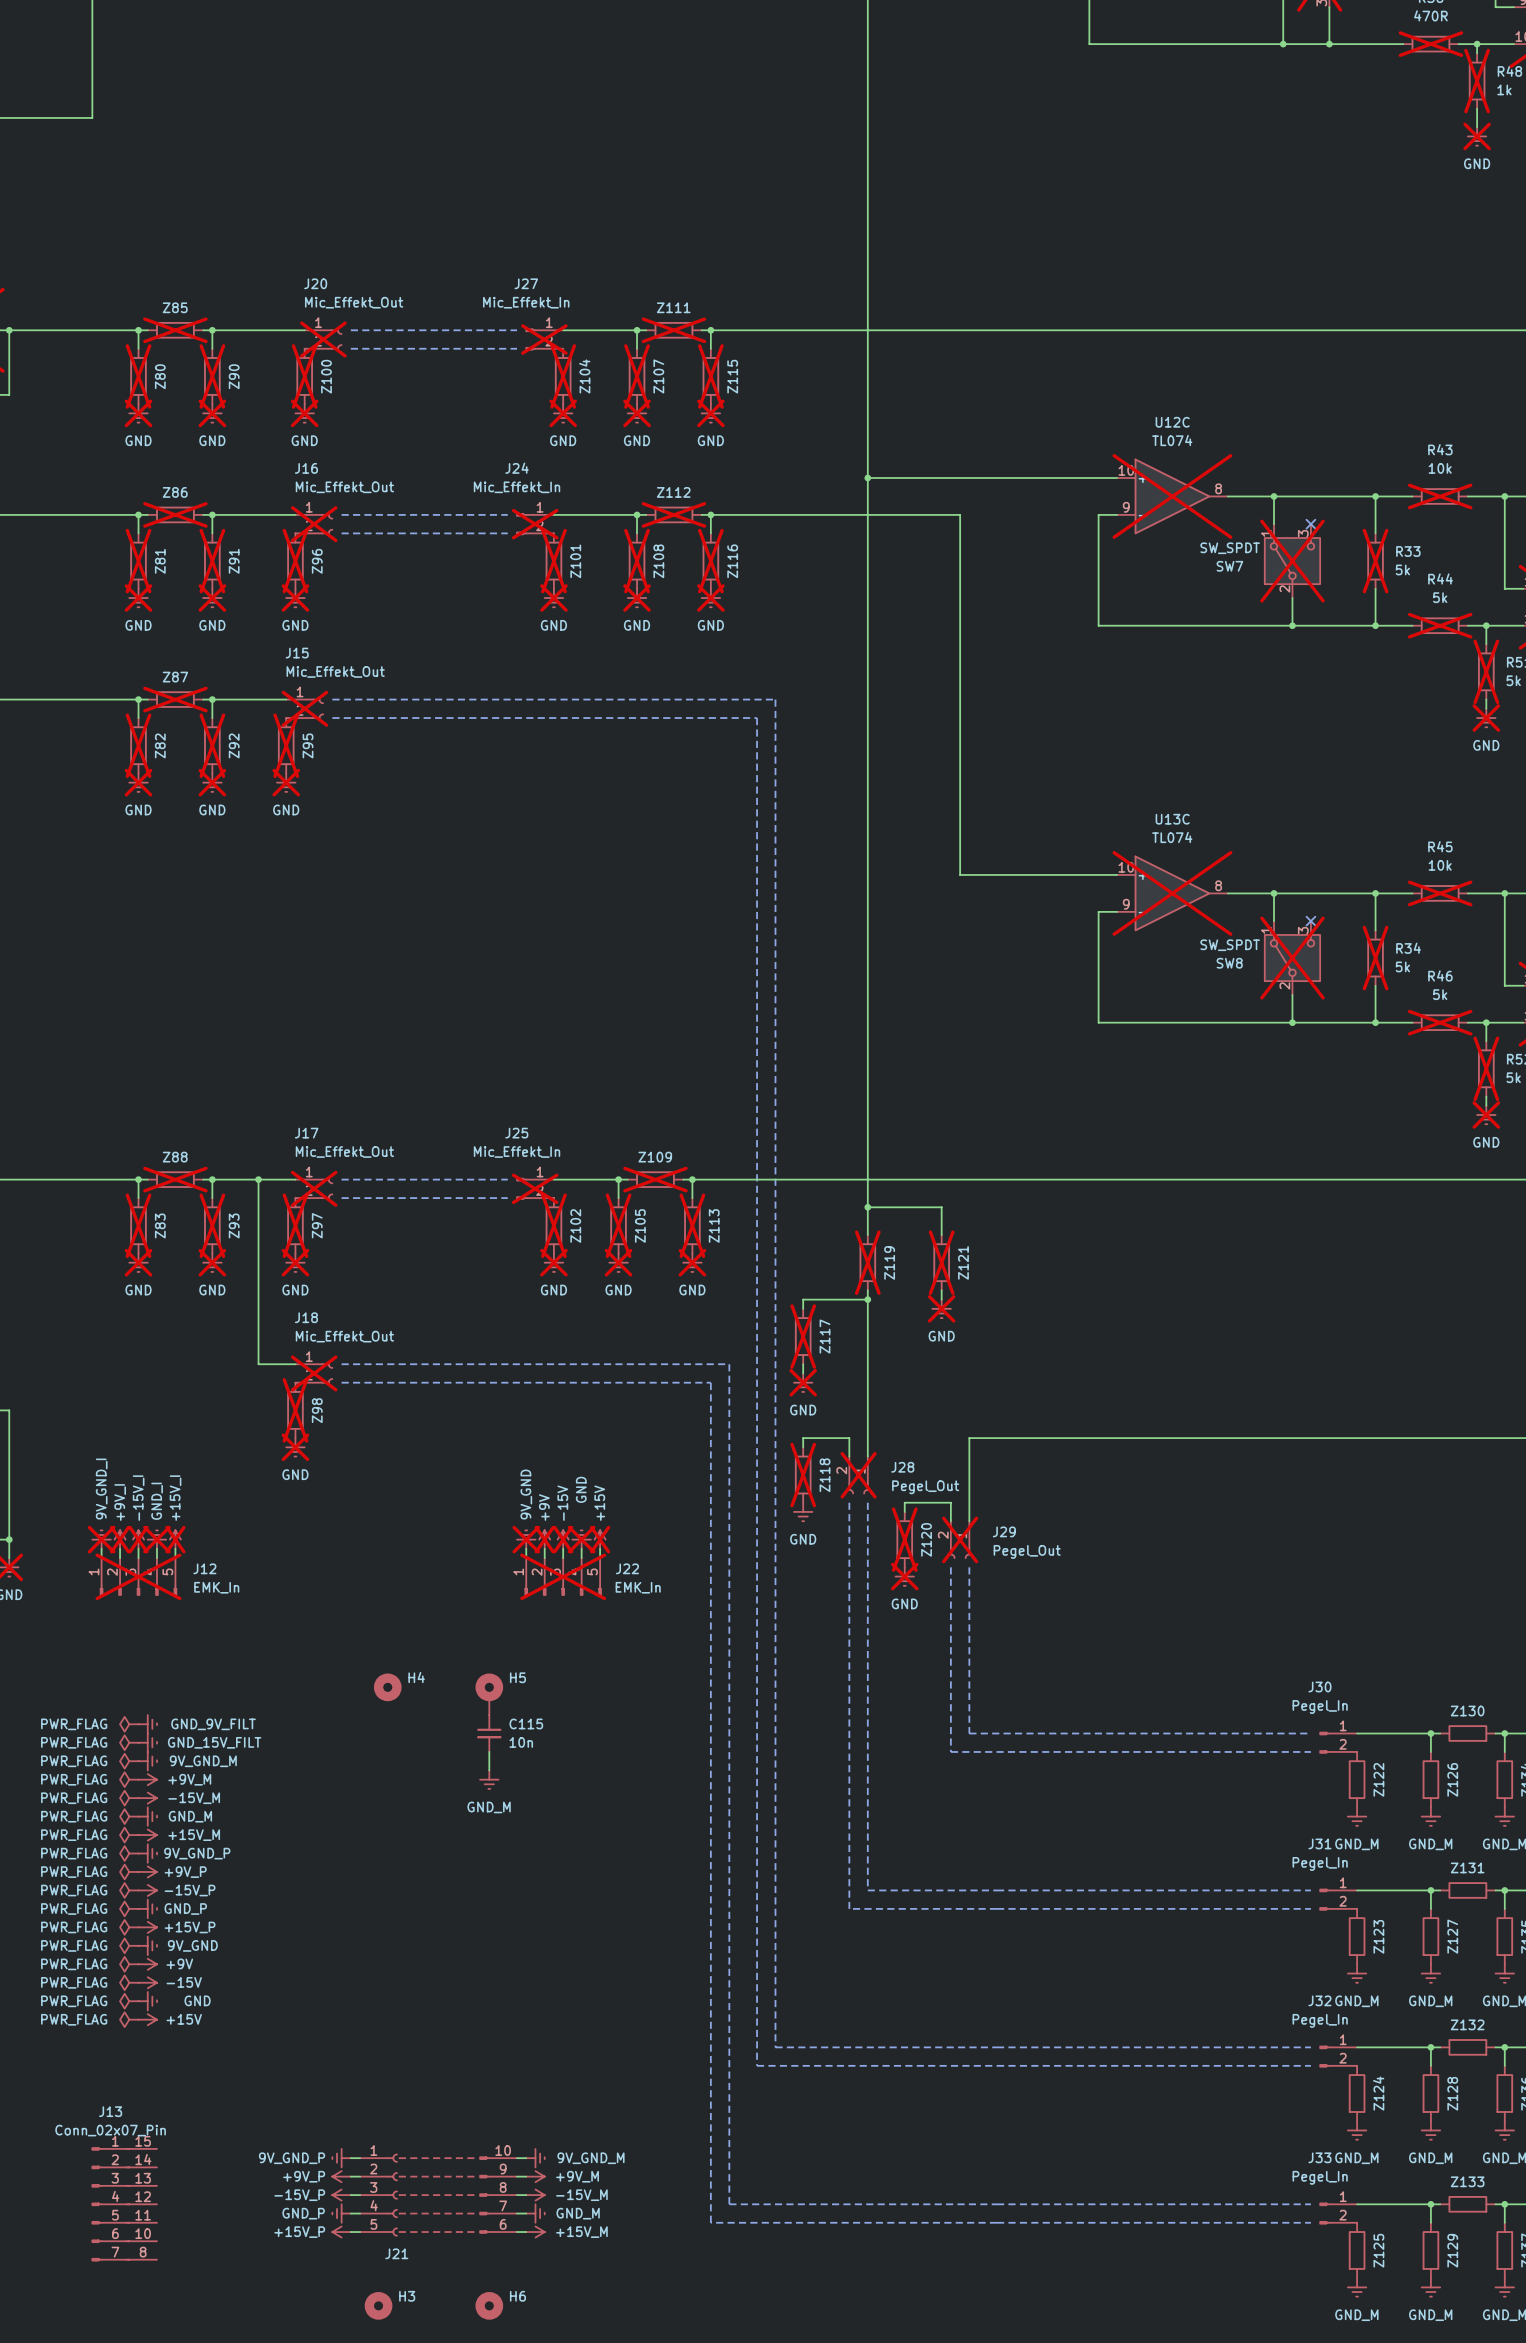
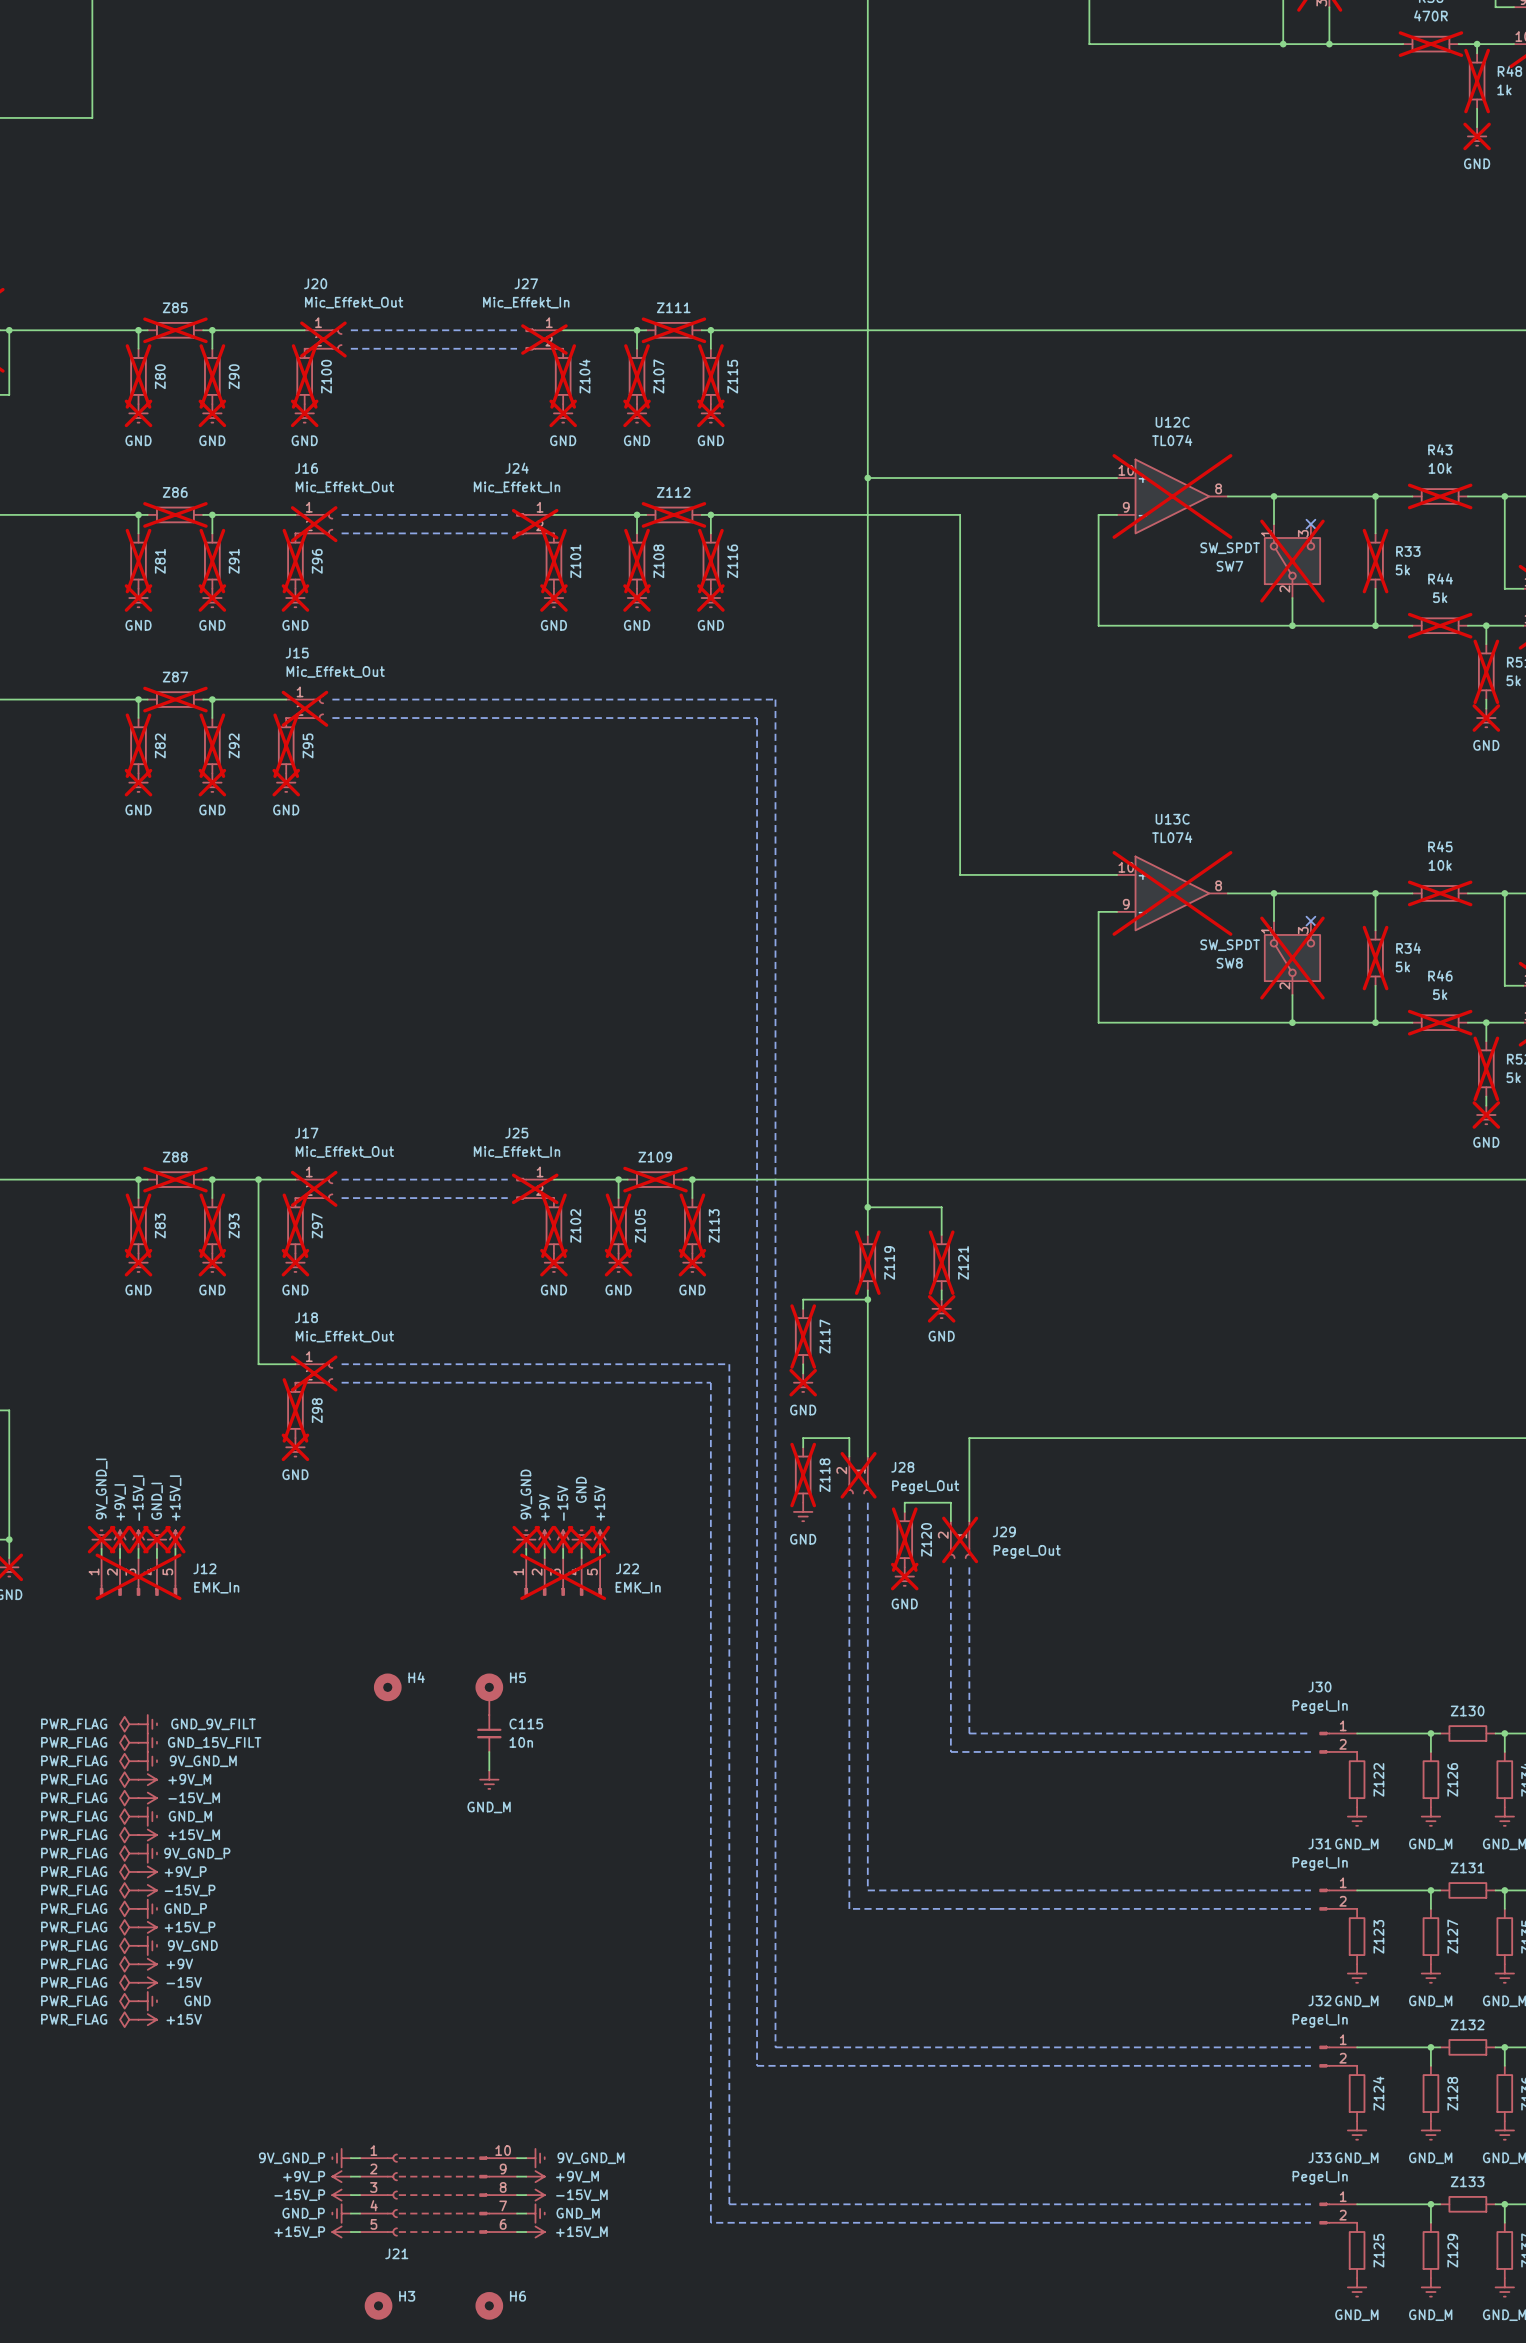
J13: Conn_02x07_Pin (124, 2204) -> none

